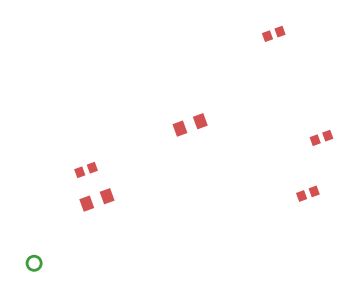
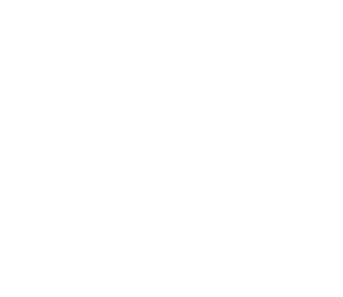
part: (273, 33) -> none
part: (190, 124) -> none
part: (321, 137) -> none
part: (86, 169) -> none
part: (307, 193) -> none
part: (96, 199) -> none
part: (34, 263) -> none

